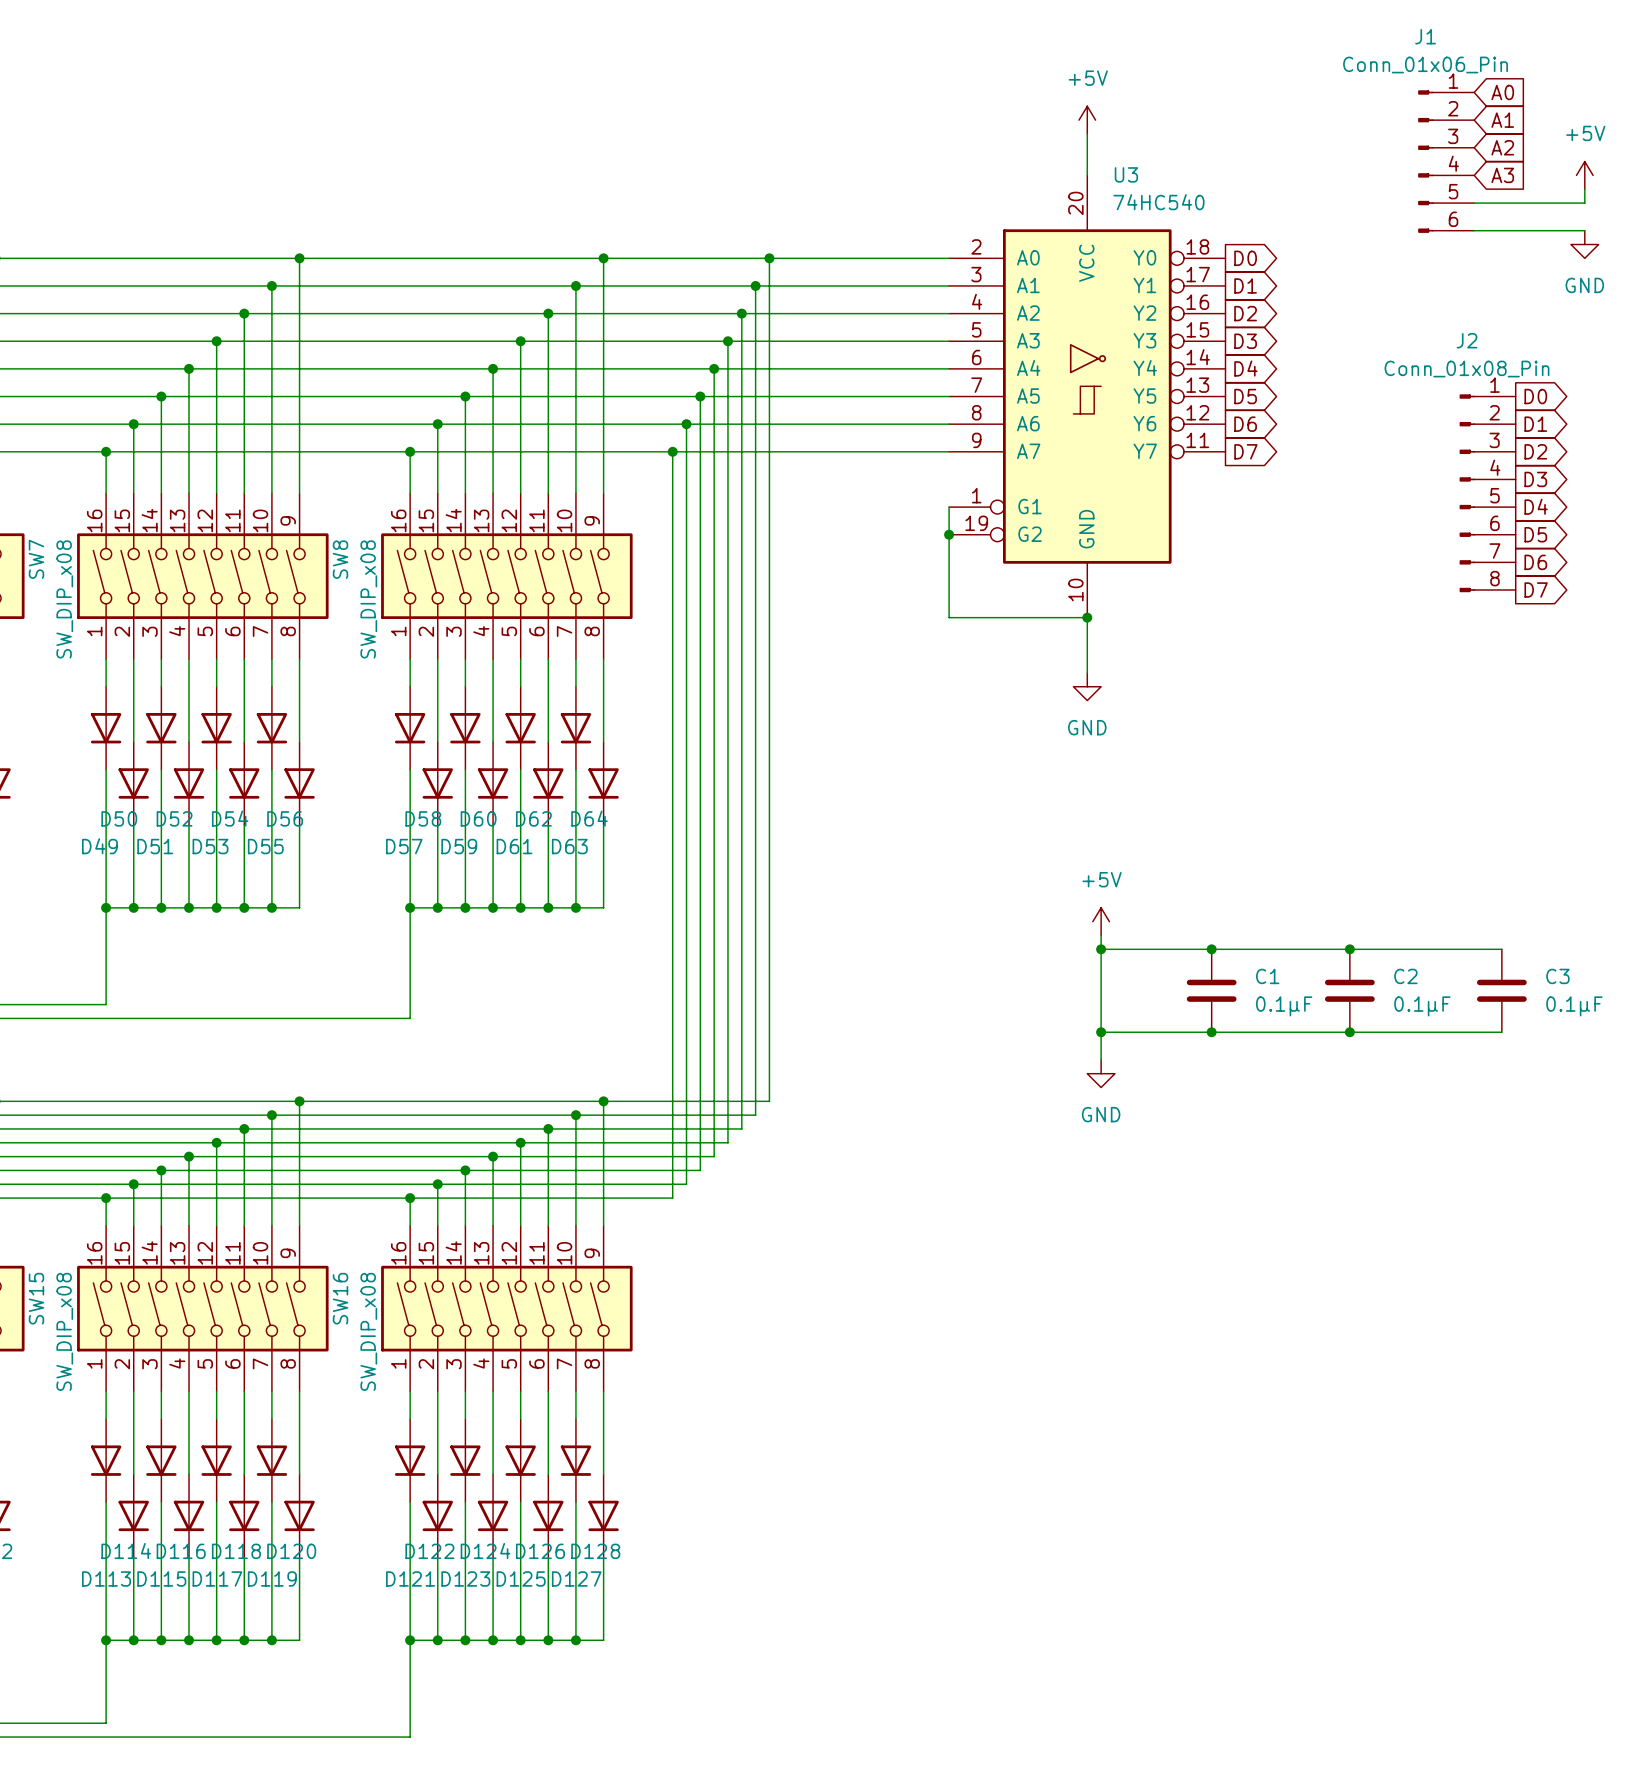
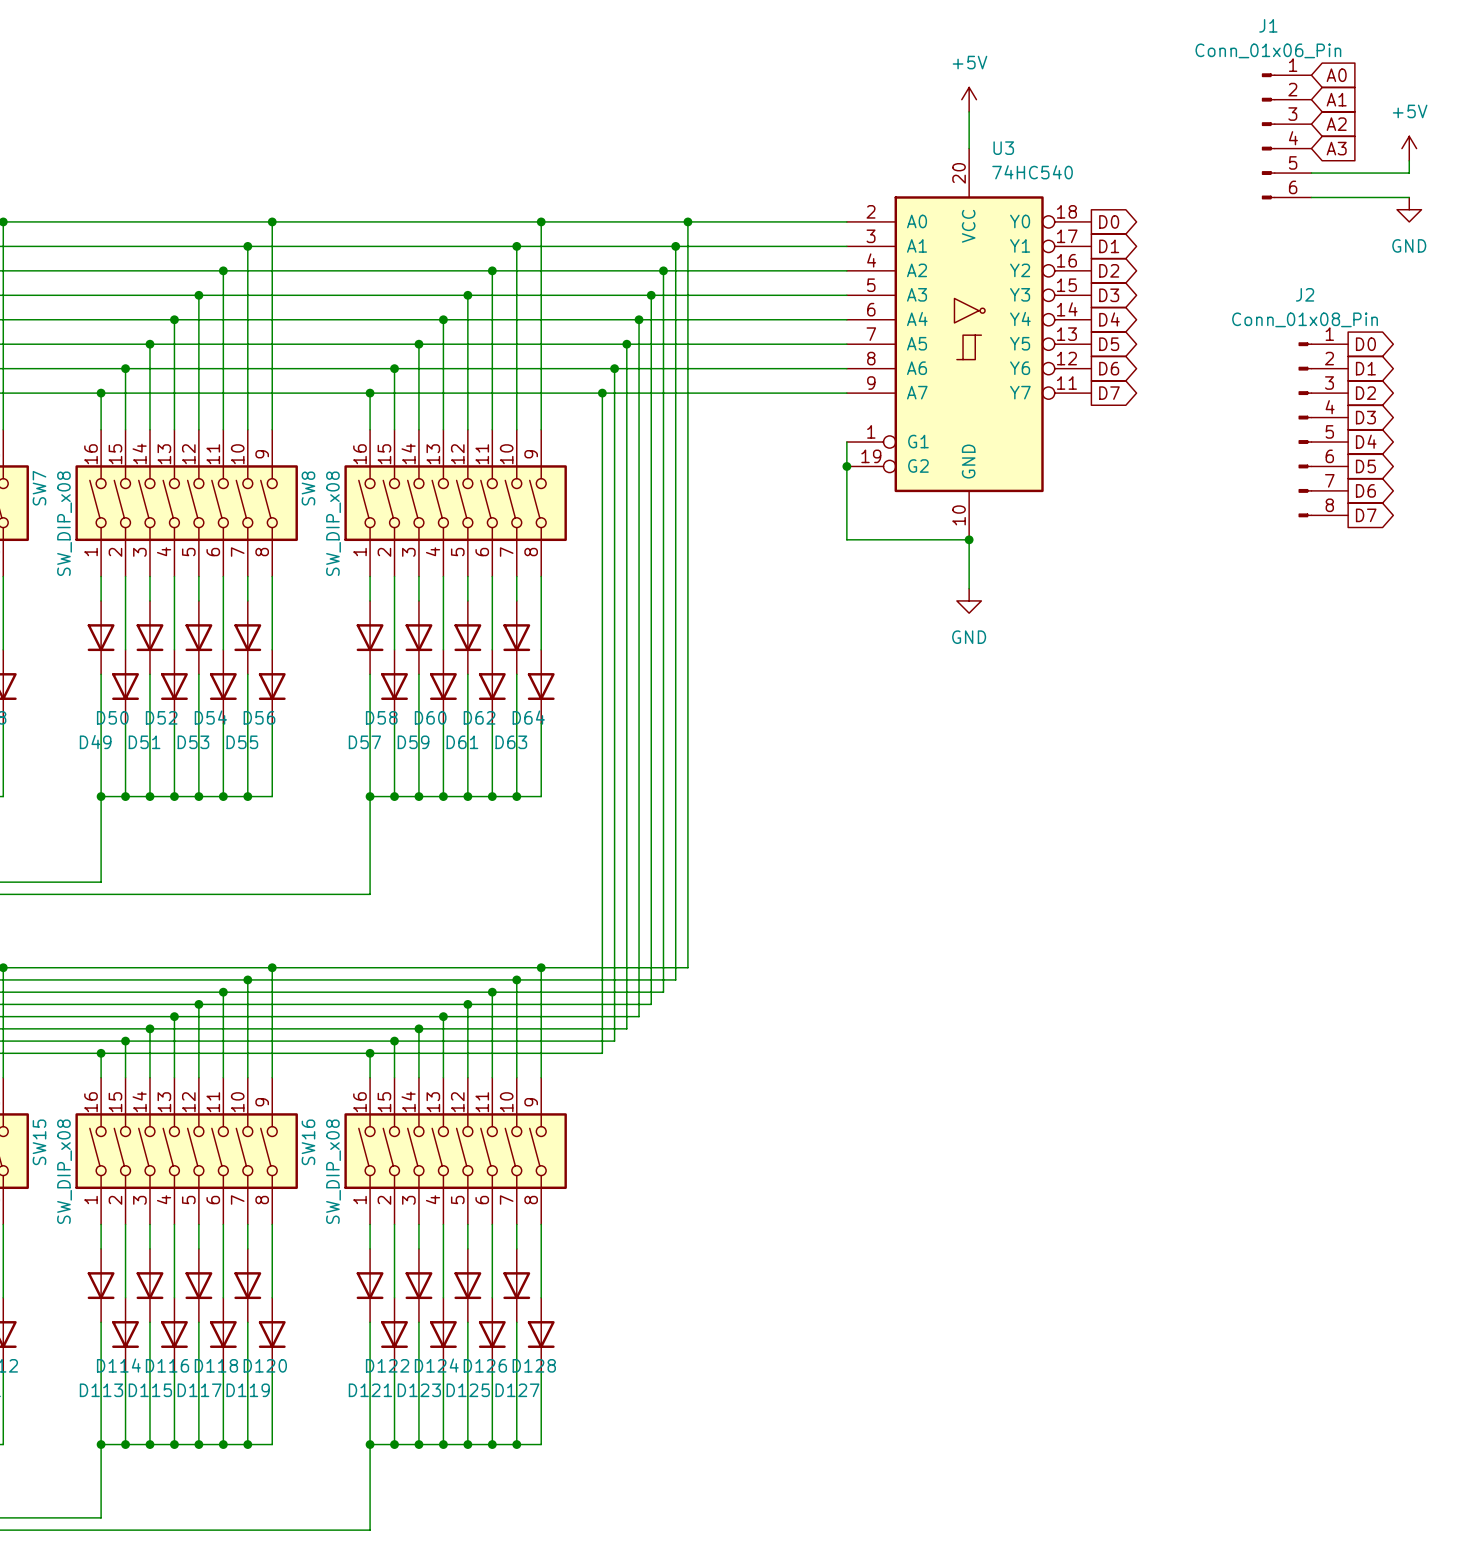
power symbol: +5V (1101, 921) -> none
wire: (1101, 935) (1101, 1059) -> none
wire: (1101, 949) (1501, 949) -> none
junction: (1101, 949) -> none
junction: (1211, 949) -> none
junction: (1349, 949) -> none
C1: 0.1μF (1211, 990) -> none
C2: 0.1μF (1349, 990) -> none
C3: 0.1μF (1501, 990) -> none
wire: (1101, 1032) (1501, 1032) -> none
junction: (1101, 1032) -> none
junction: (1211, 1032) -> none
junction: (1349, 1032) -> none
power symbol: GND (1101, 1073) -> none

